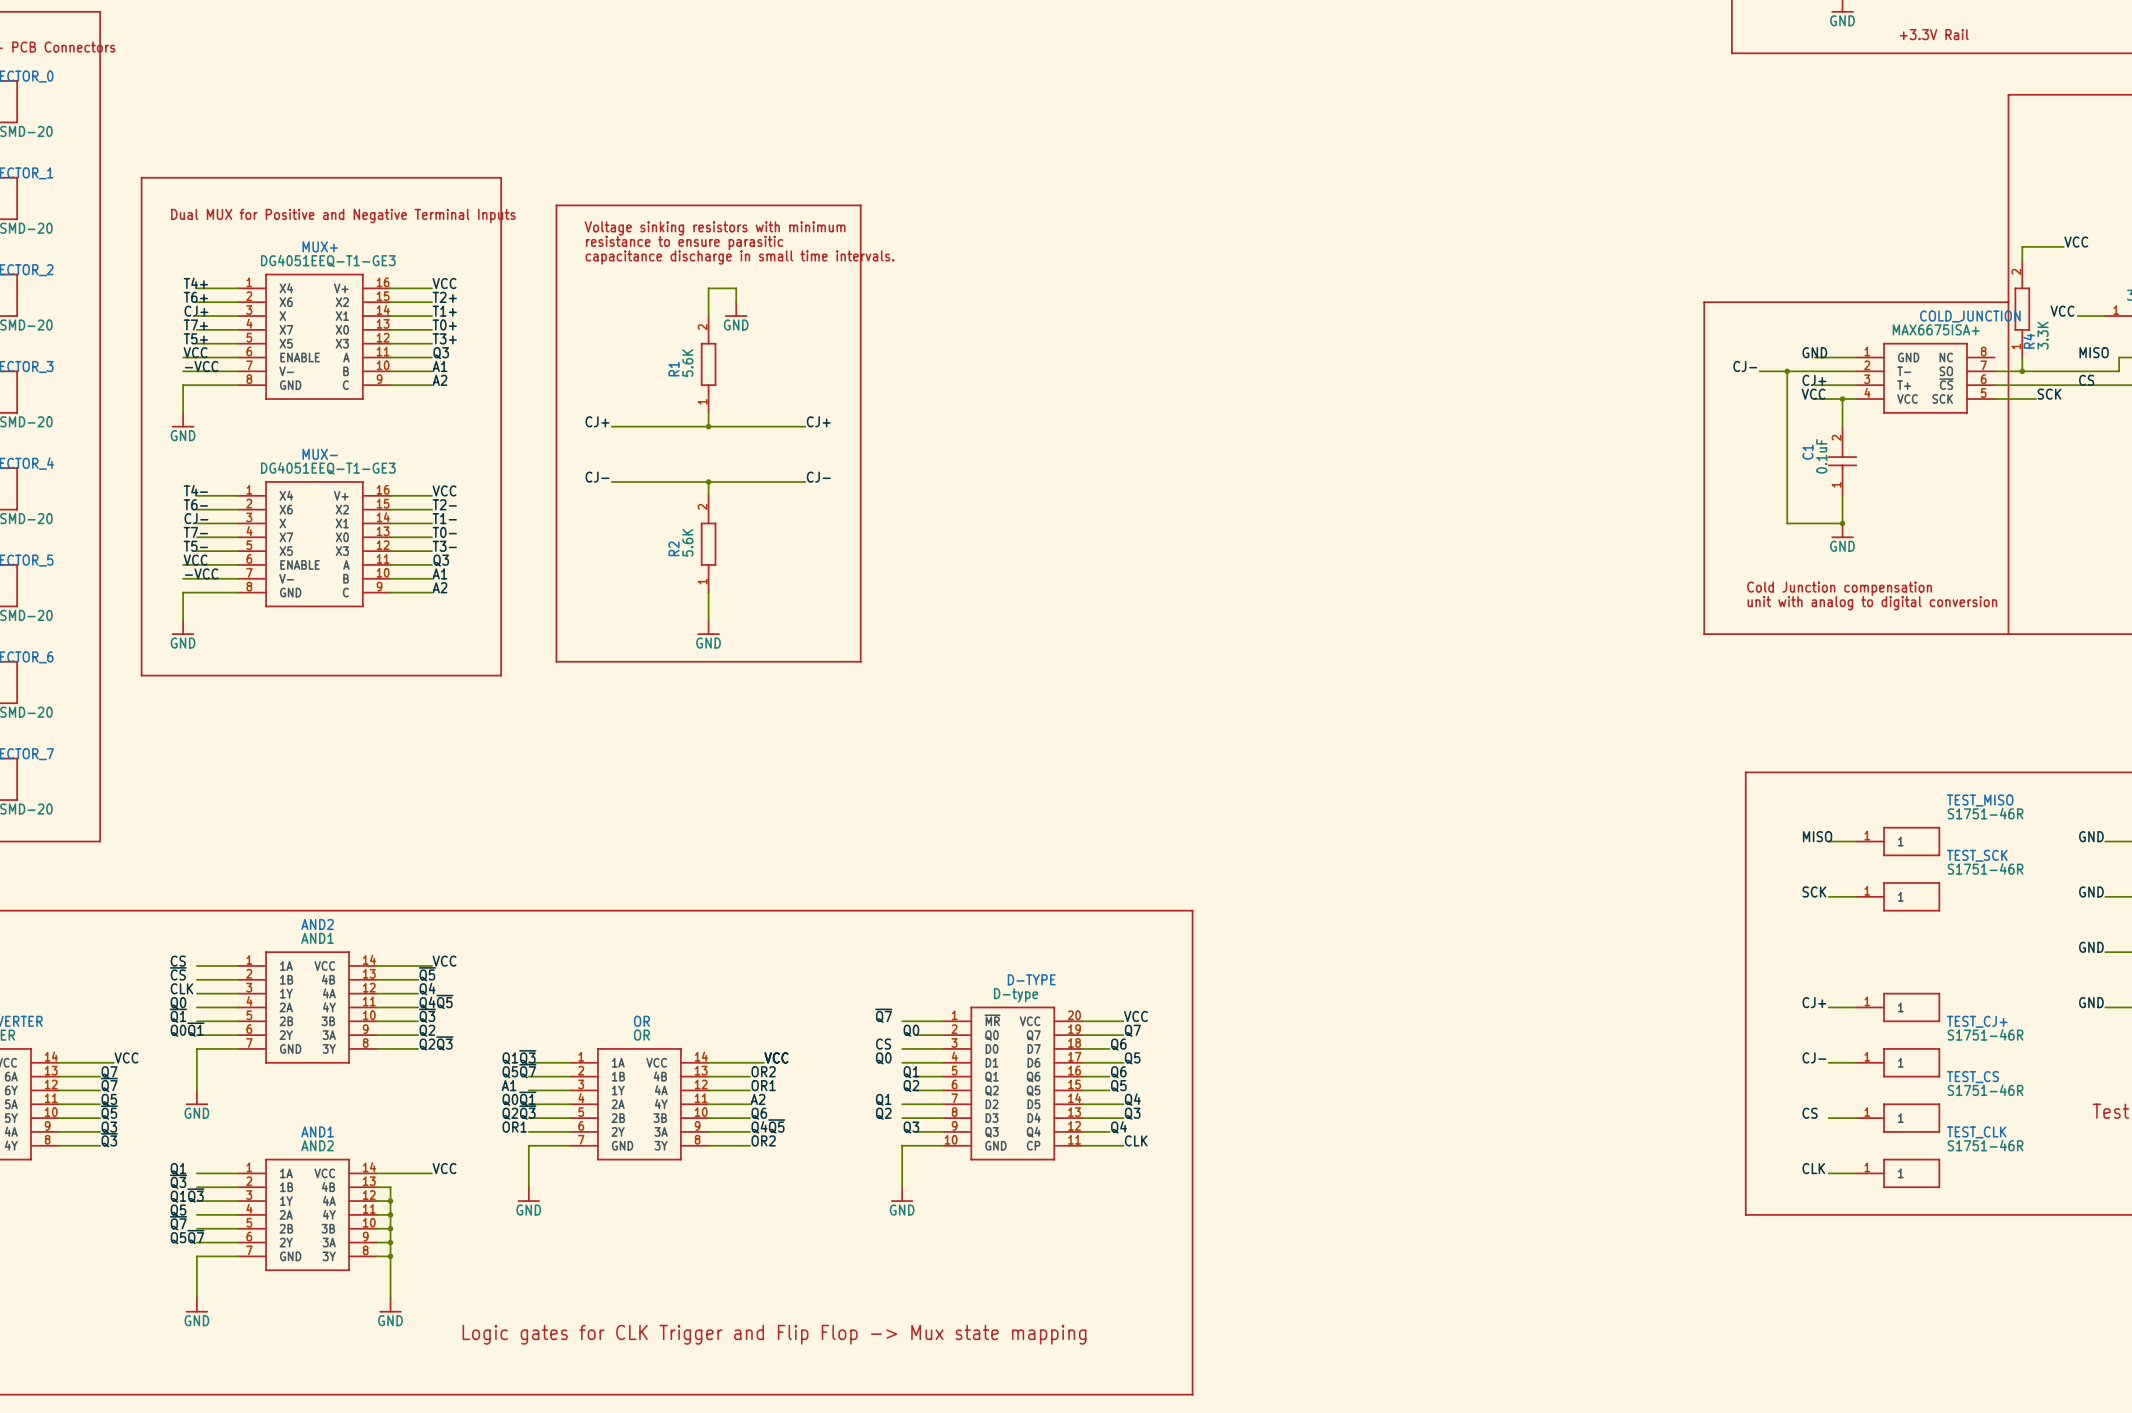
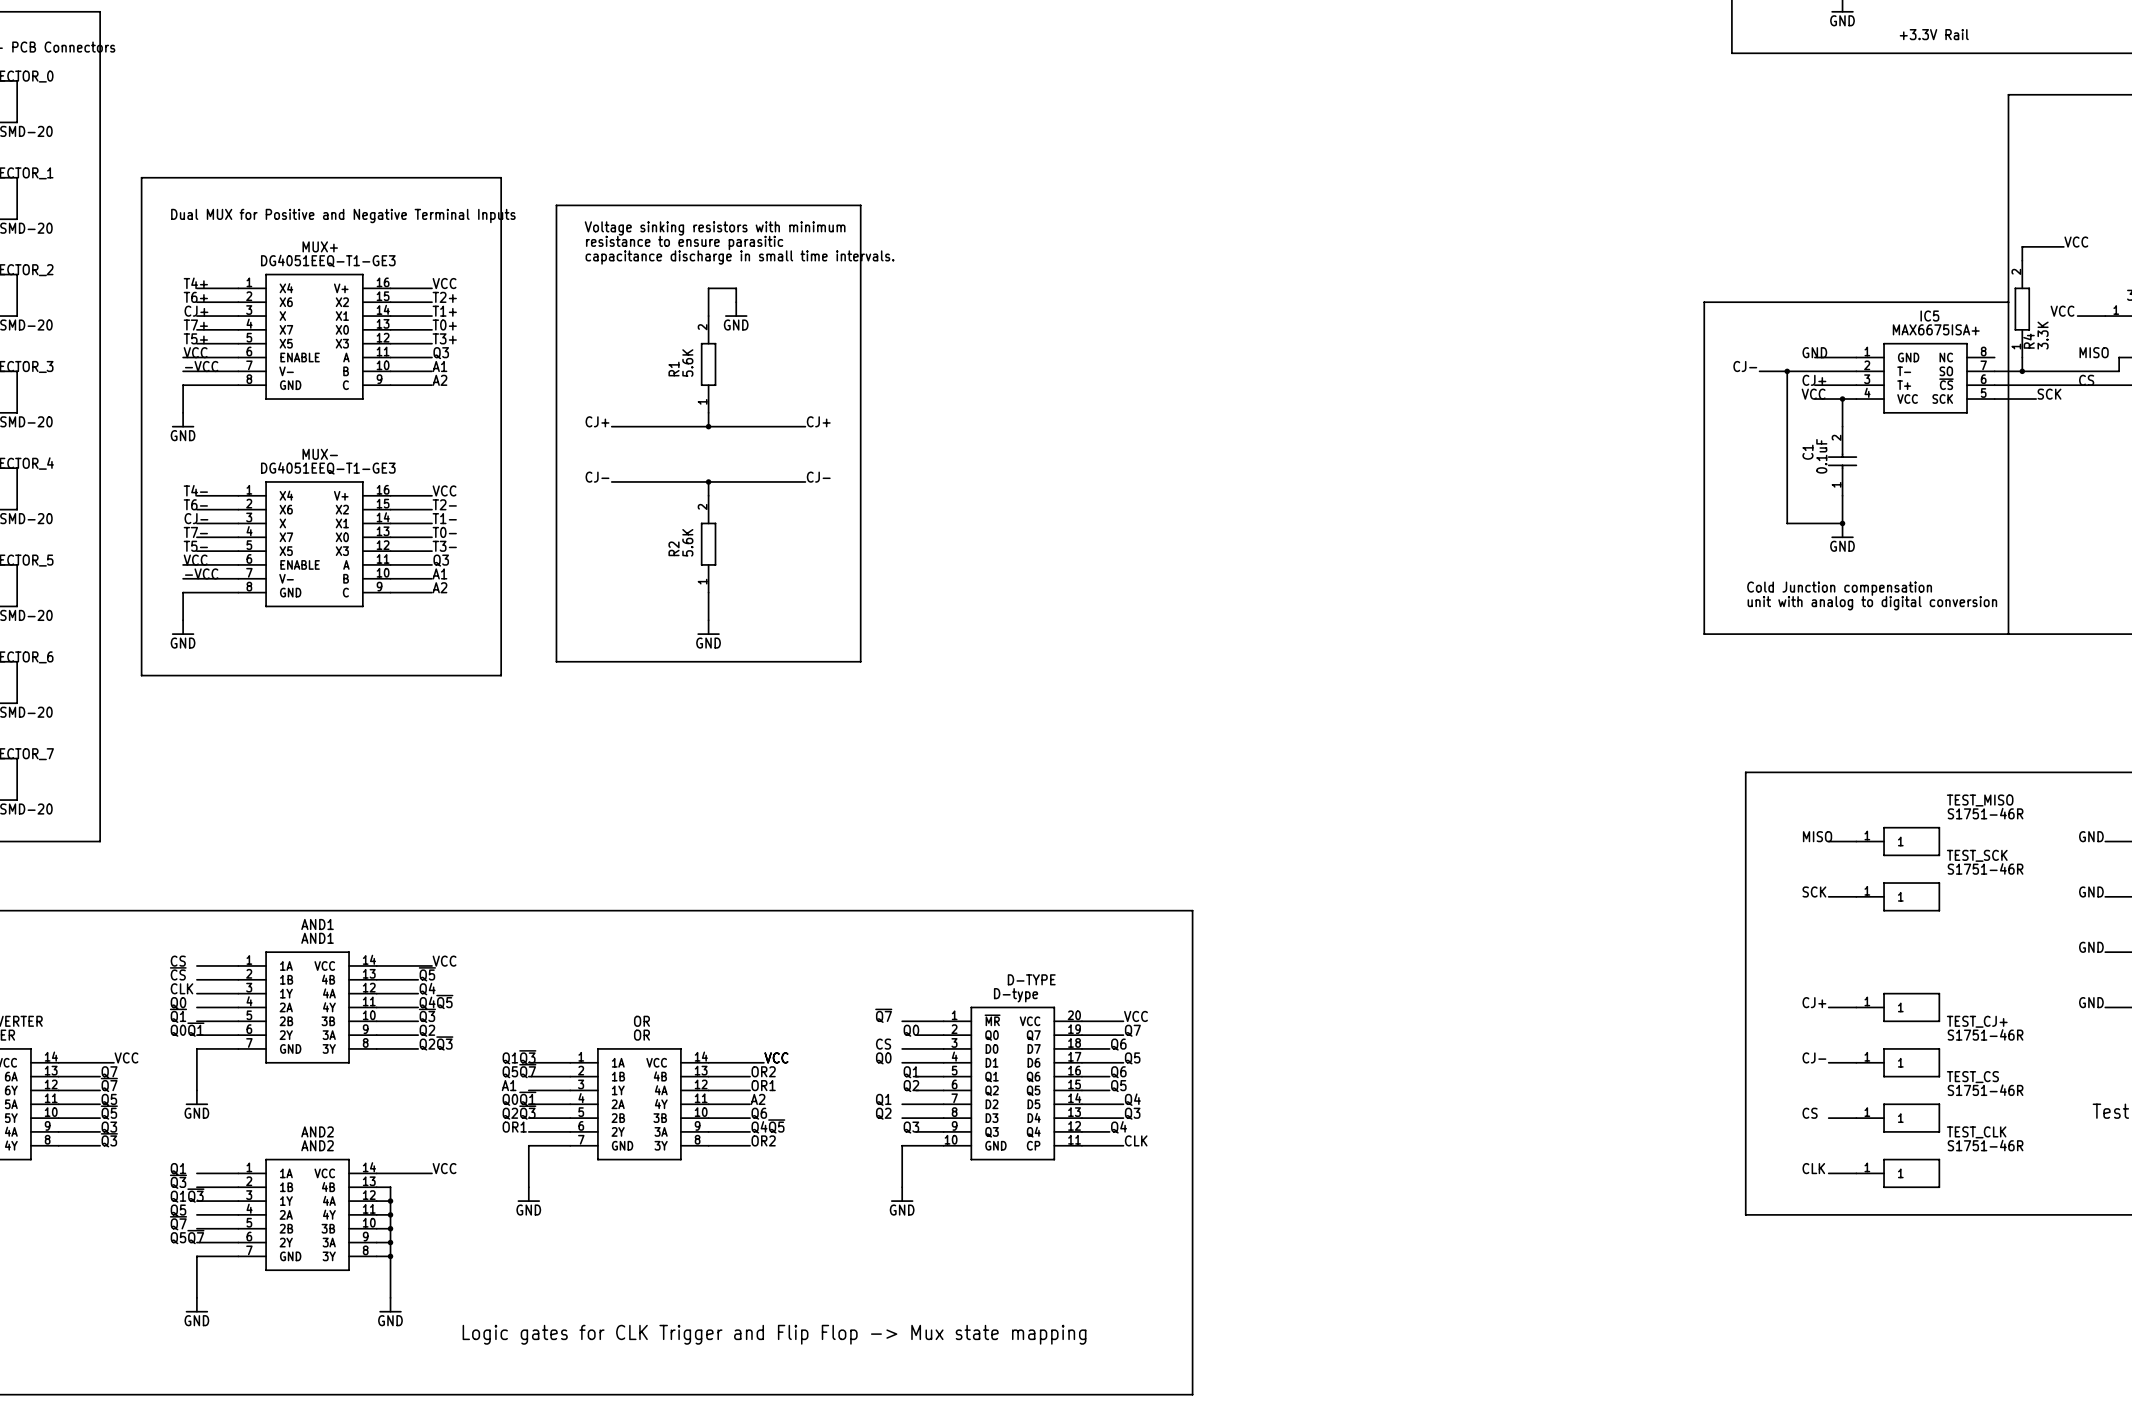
COLD_JUNCTION name: COLD_JUNCTION (1970, 316) -> IC5 (1929, 316)
AND2 name: AND2 (317, 924) -> AND1 (317, 924)
AND1 name: AND1 (317, 1131) -> AND2 (317, 1131)

